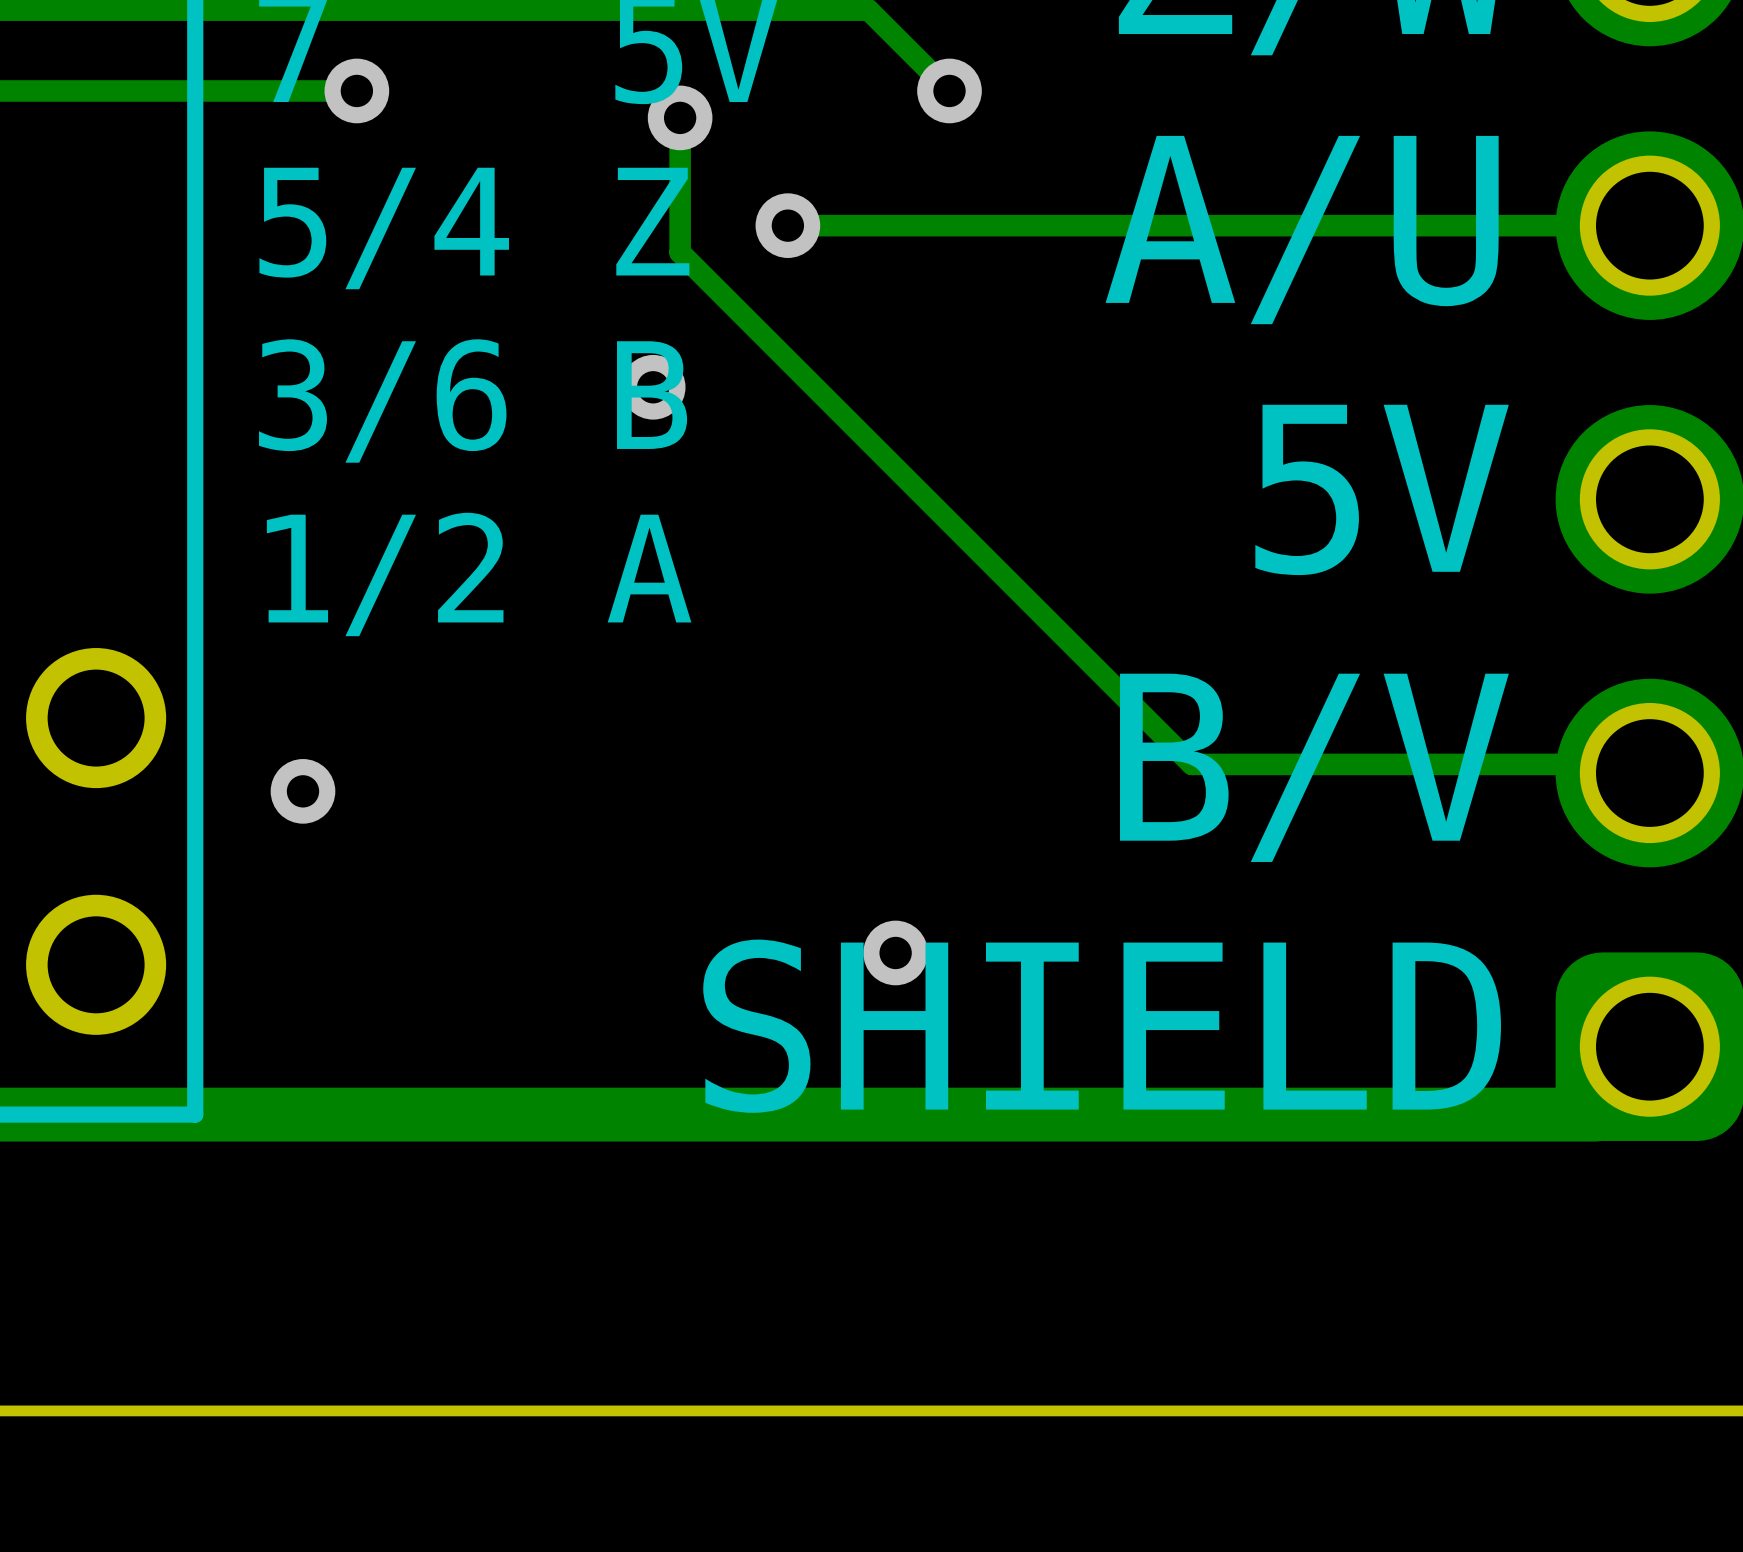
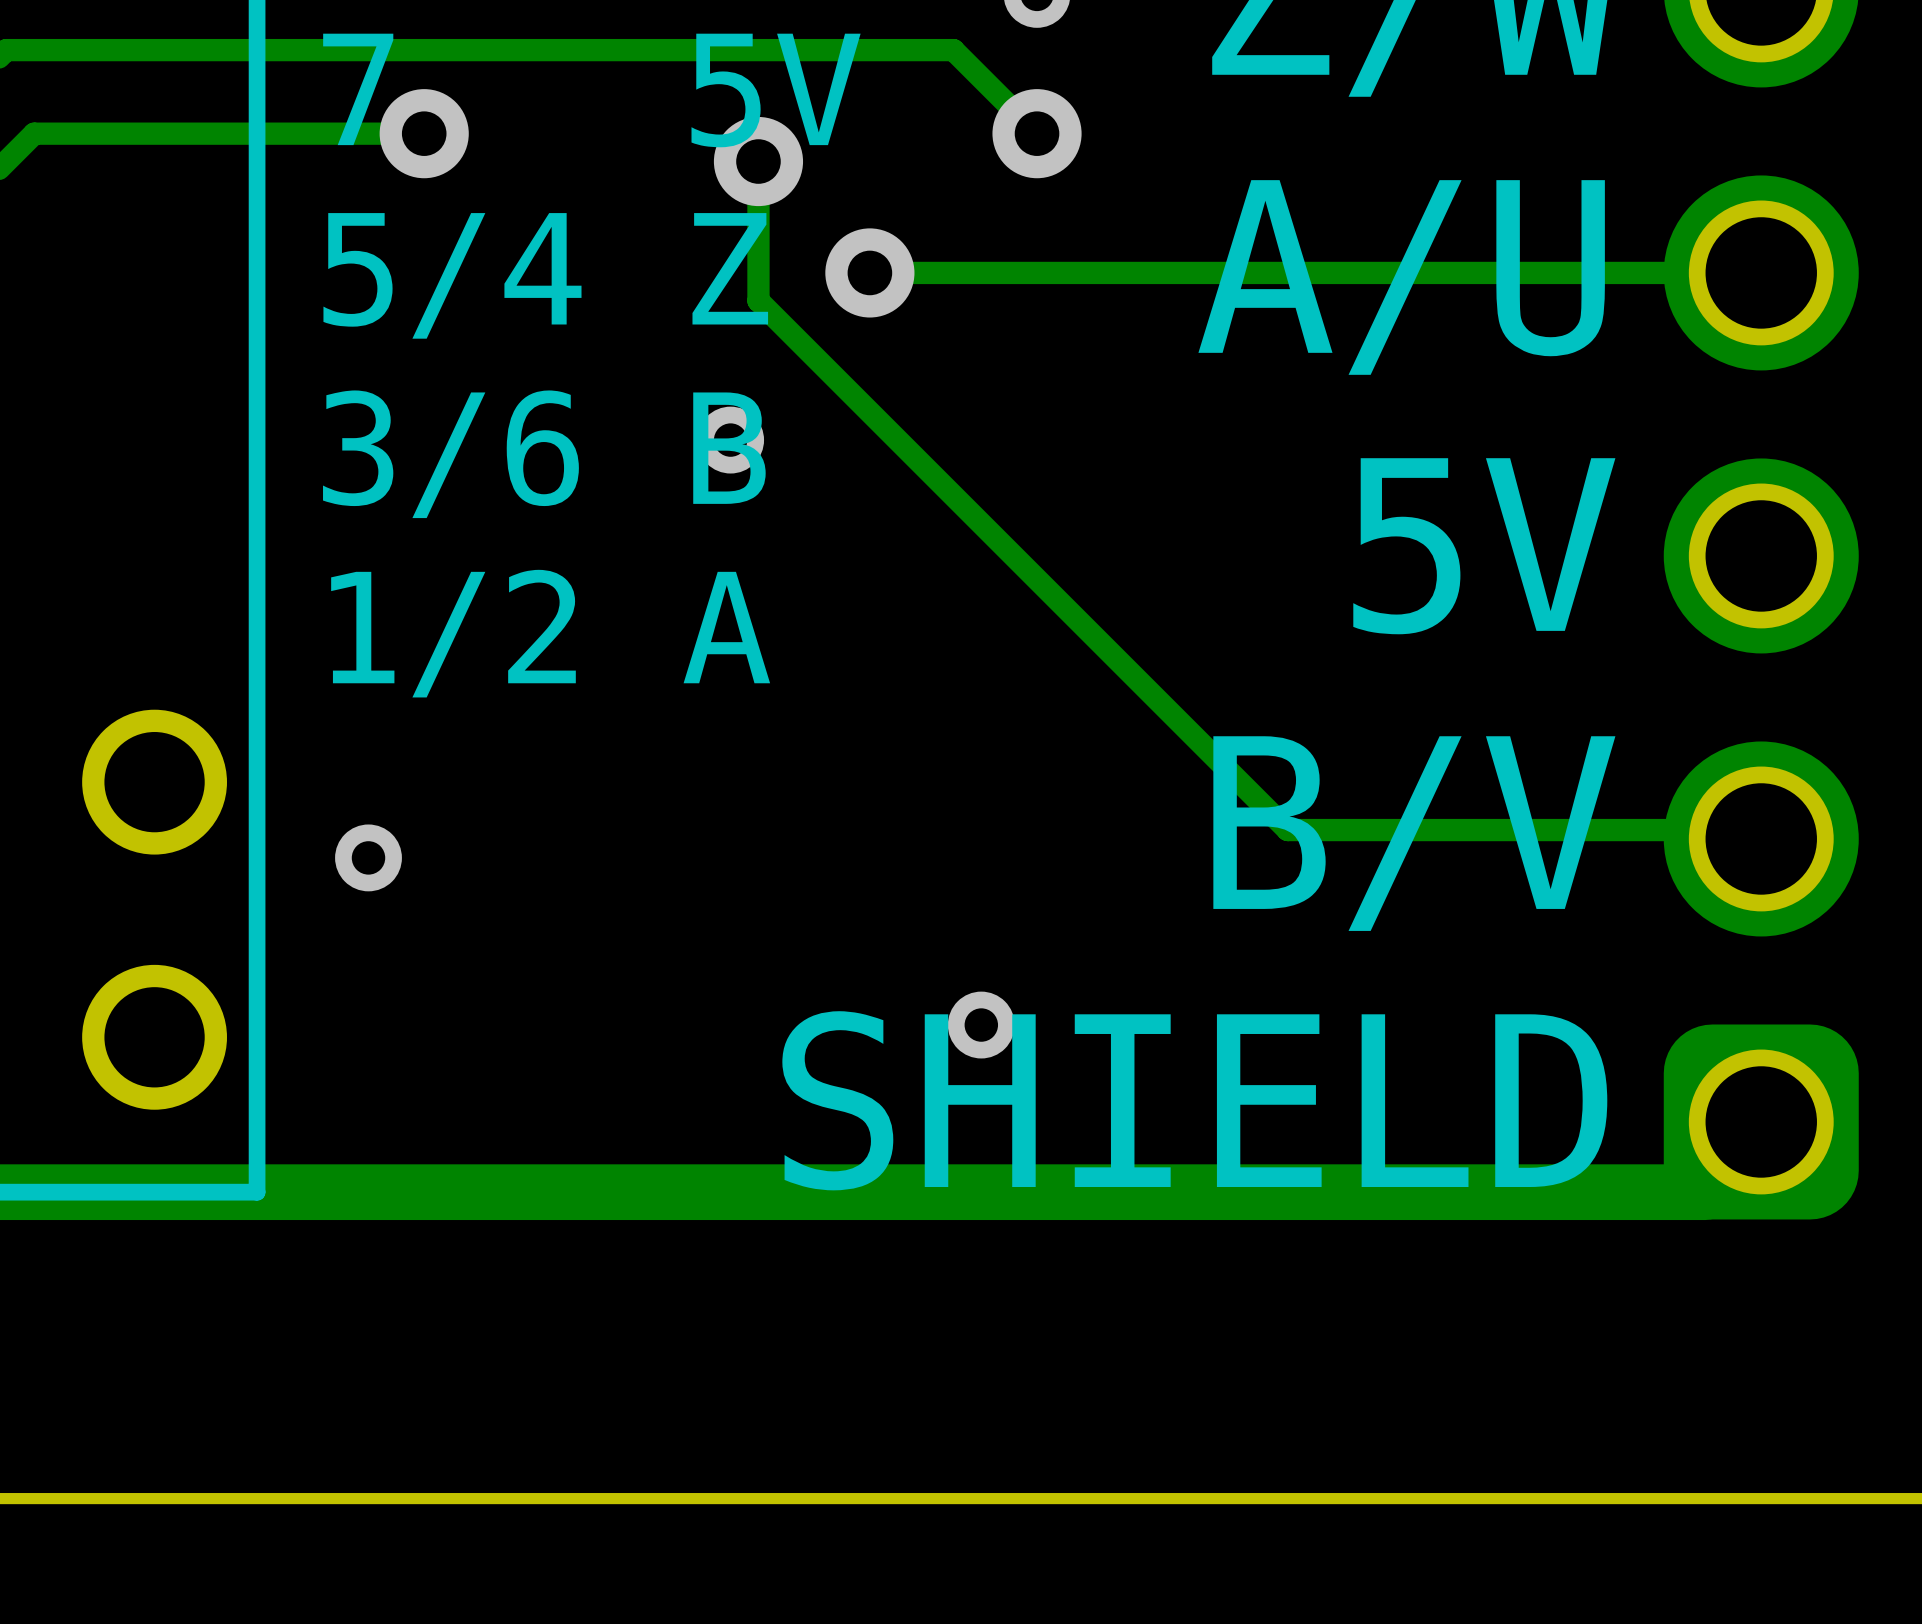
via size: [324, 58, 390, 124] -> [379, 89, 469, 179]
via size: [917, 58, 982, 124] -> [992, 89, 1082, 179]
via size: [647, 85, 713, 151] -> [713, 116, 804, 207]
via size: [755, 193, 821, 258] -> [825, 228, 915, 318]

